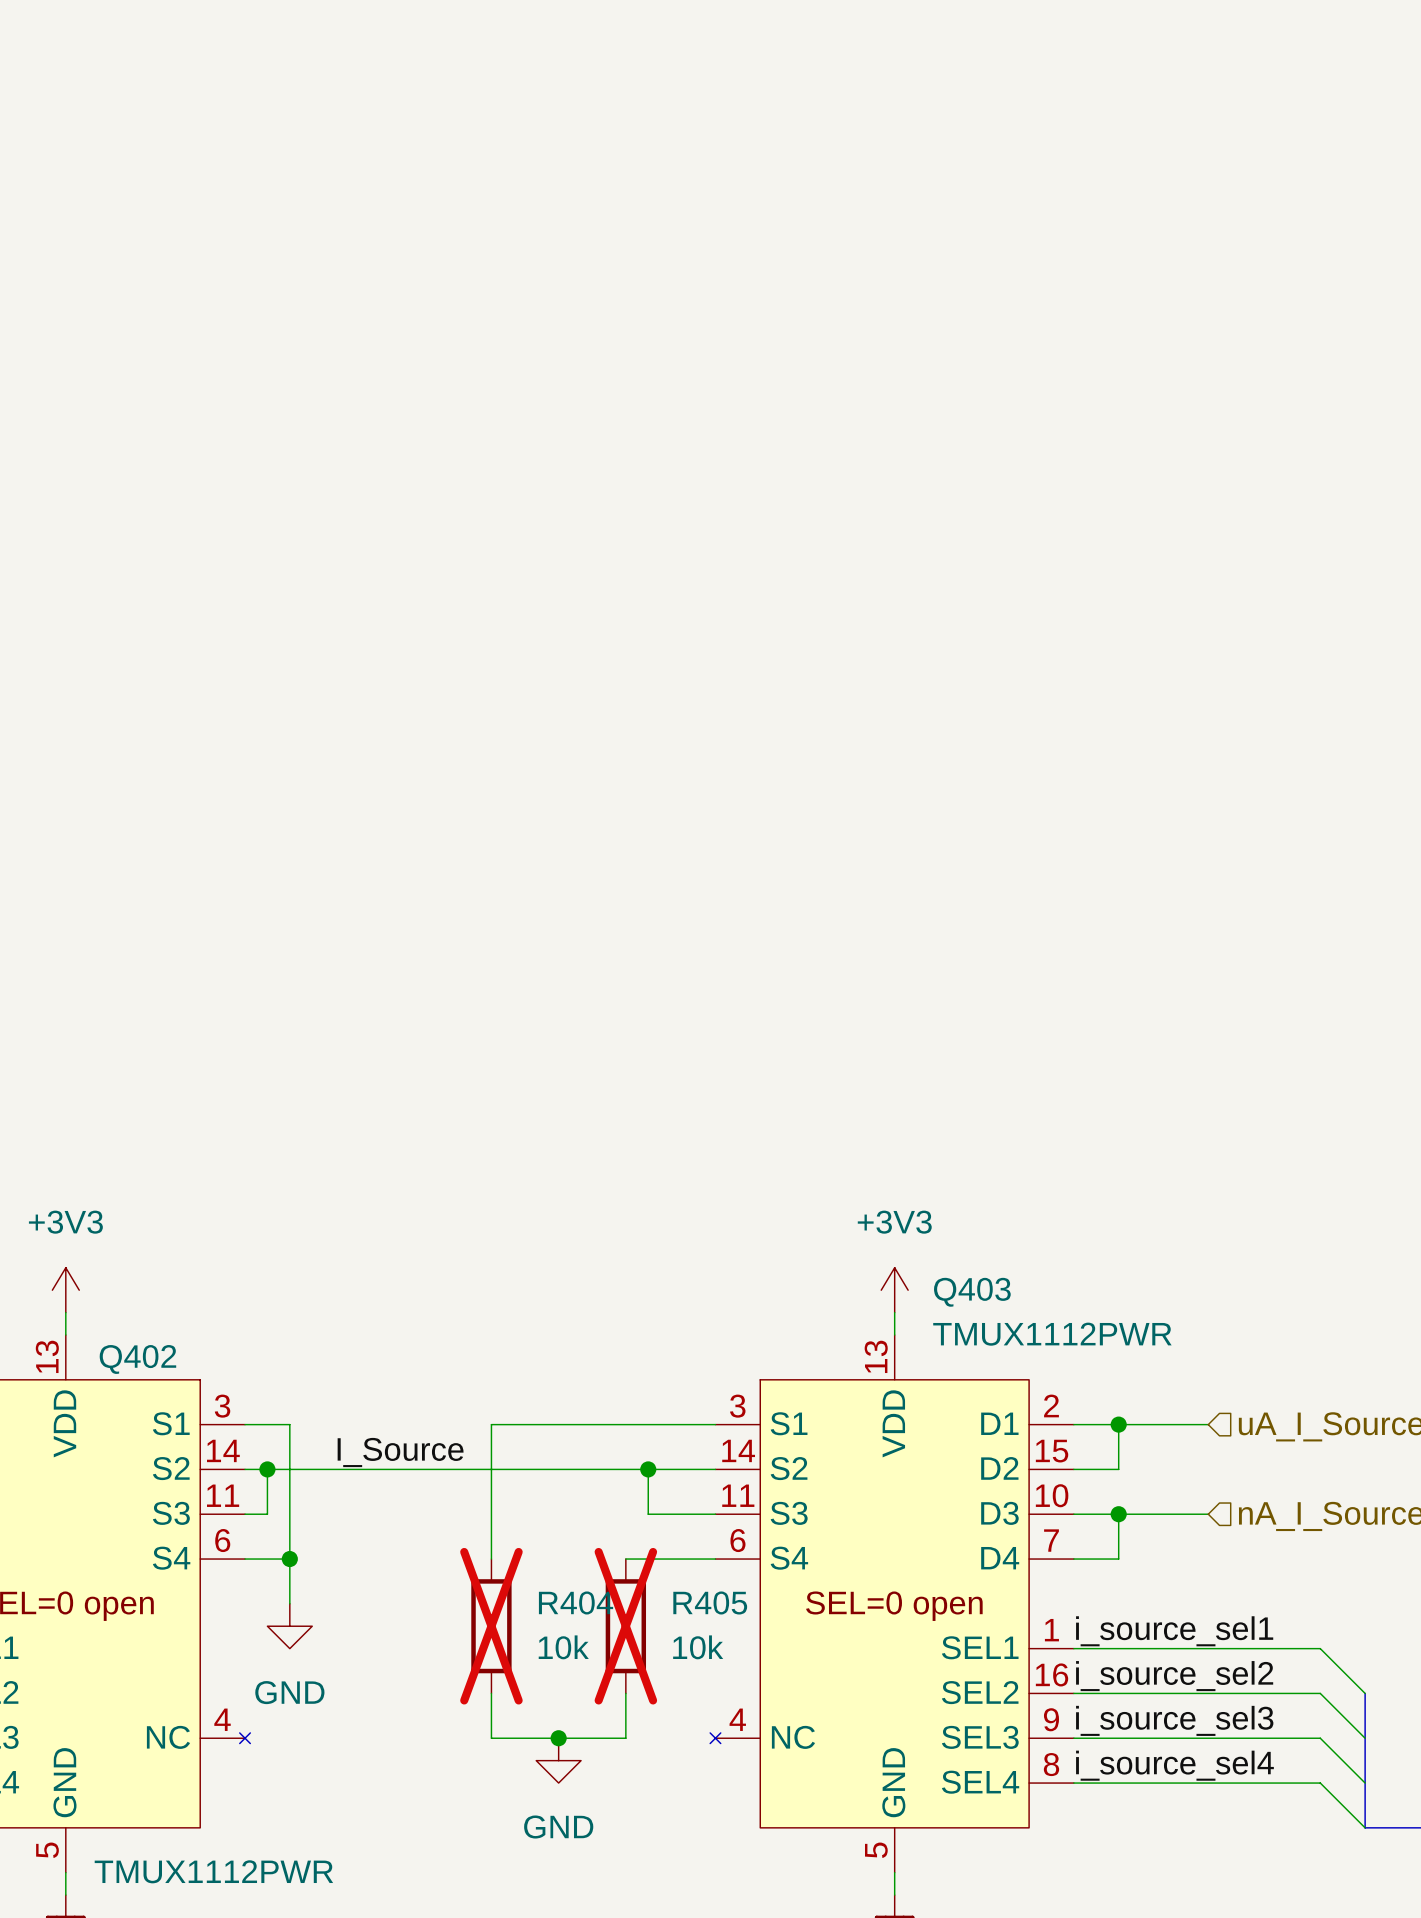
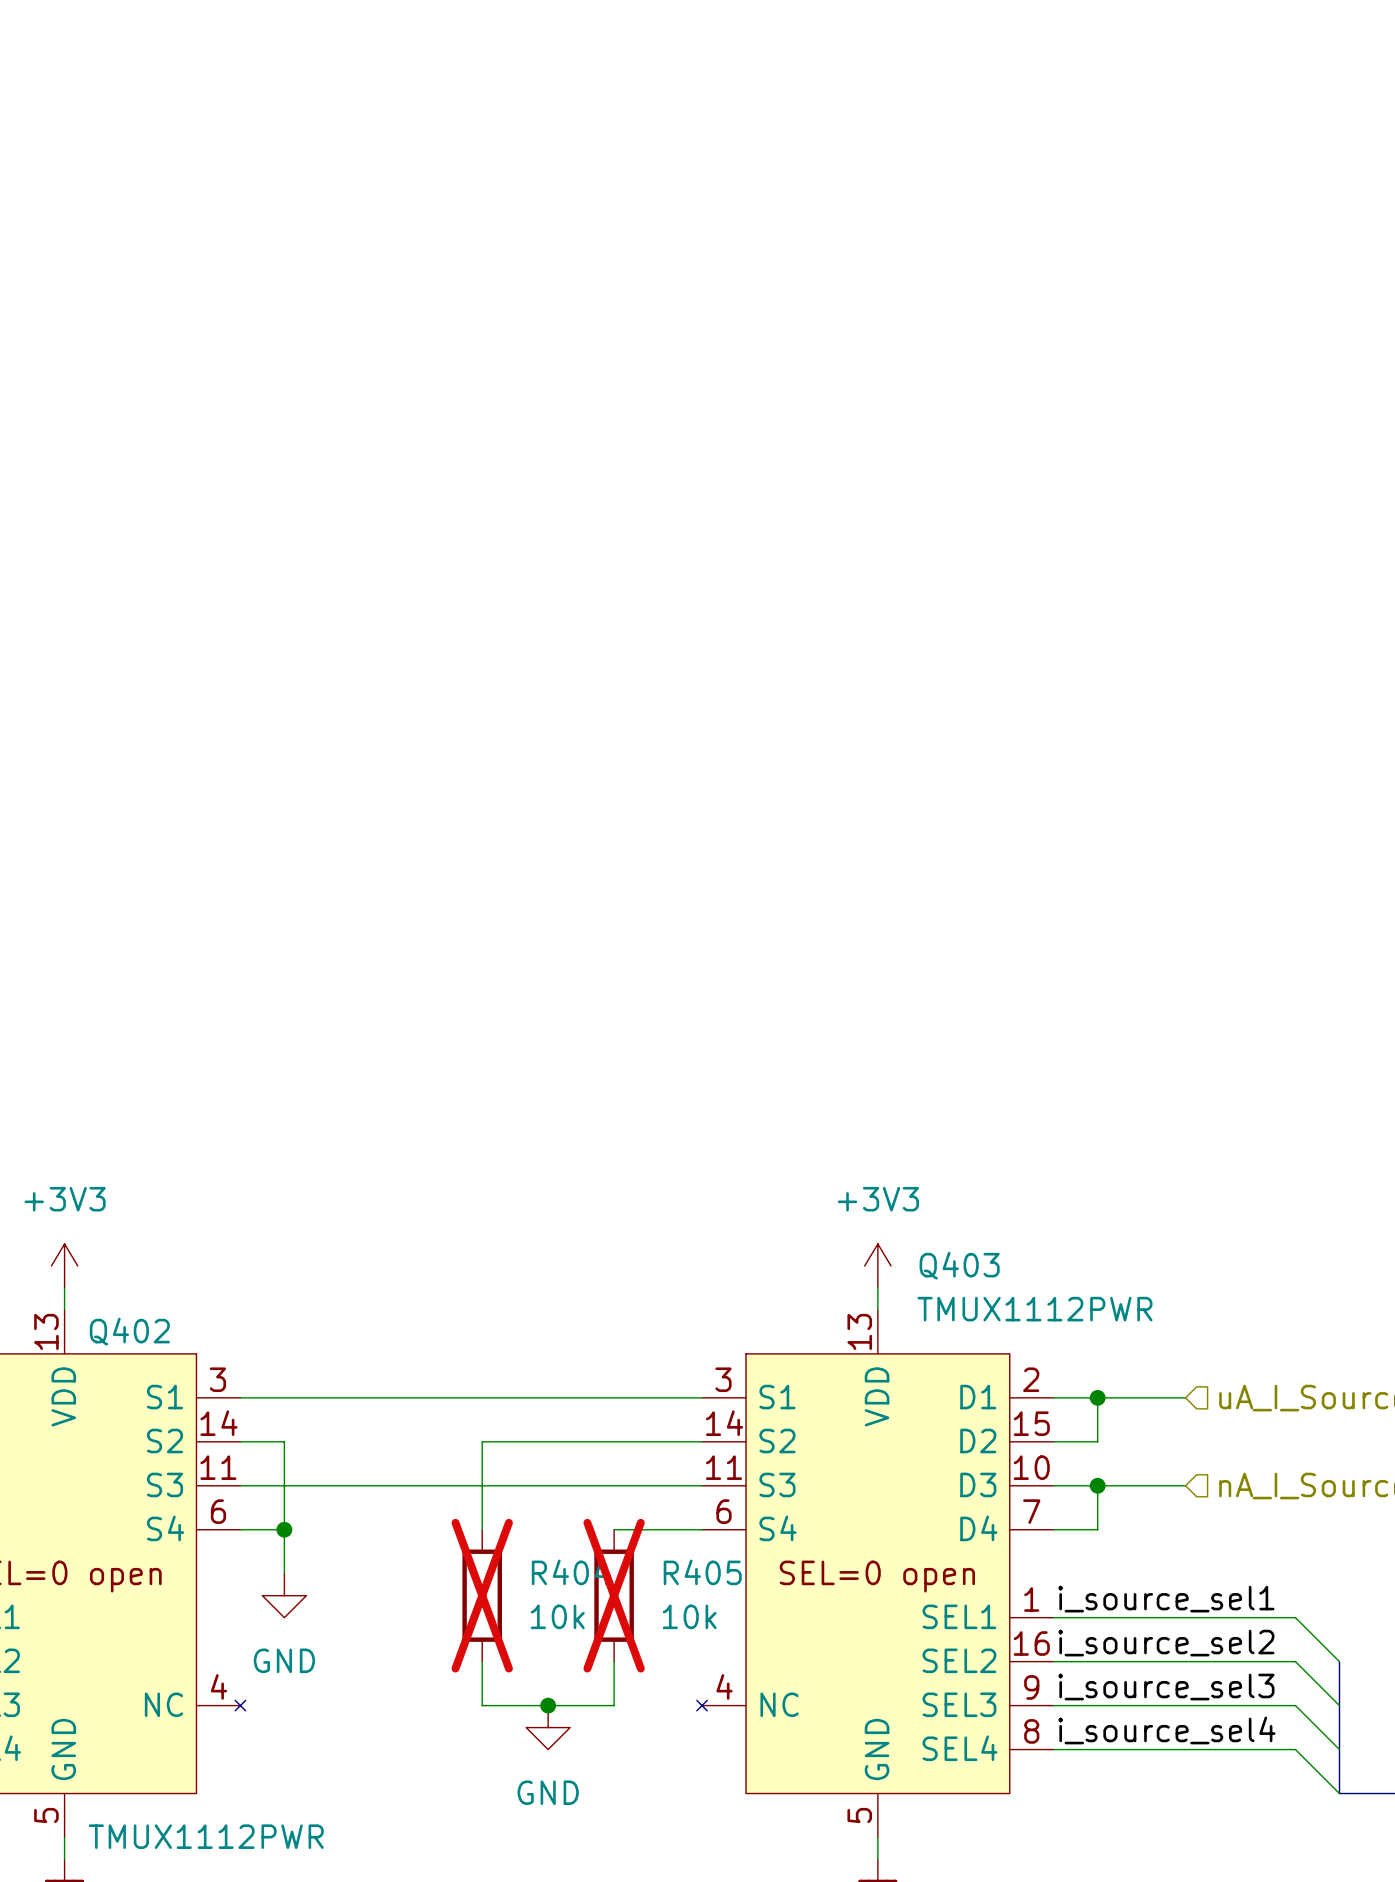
wire: (289, 1424) (289, 1469) (491, 1469) (491, 1424) -> (284, 1397) (482, 1397)
label: I_Source (400, 1452) -> none
wire: (267, 1469) (267, 1514) -> (636, 1485) (262, 1485)
junction: (267, 1469) -> none
wire: (648, 1469) (648, 1514) -> none
junction: (648, 1469) -> none

